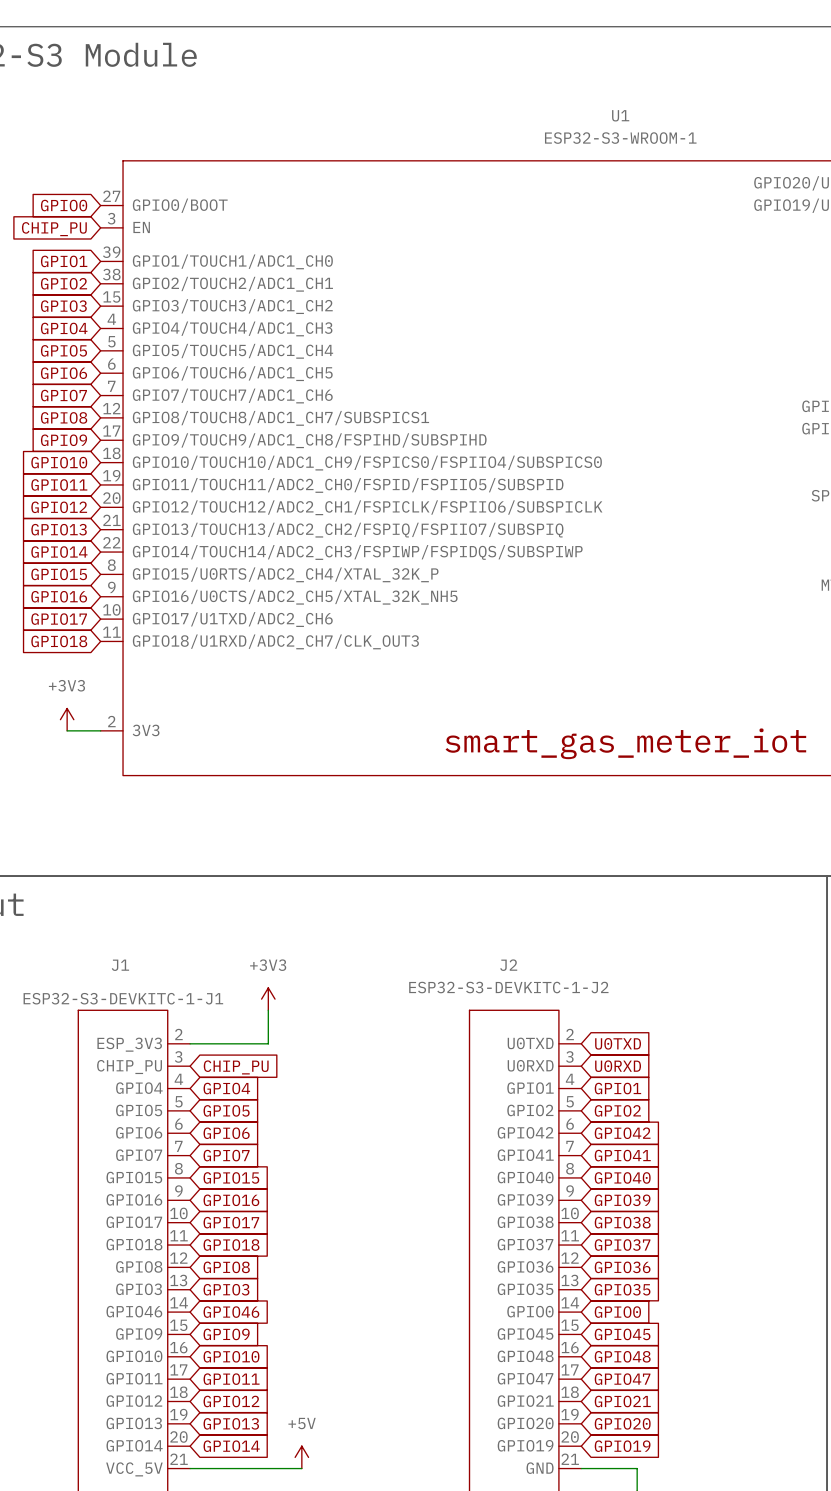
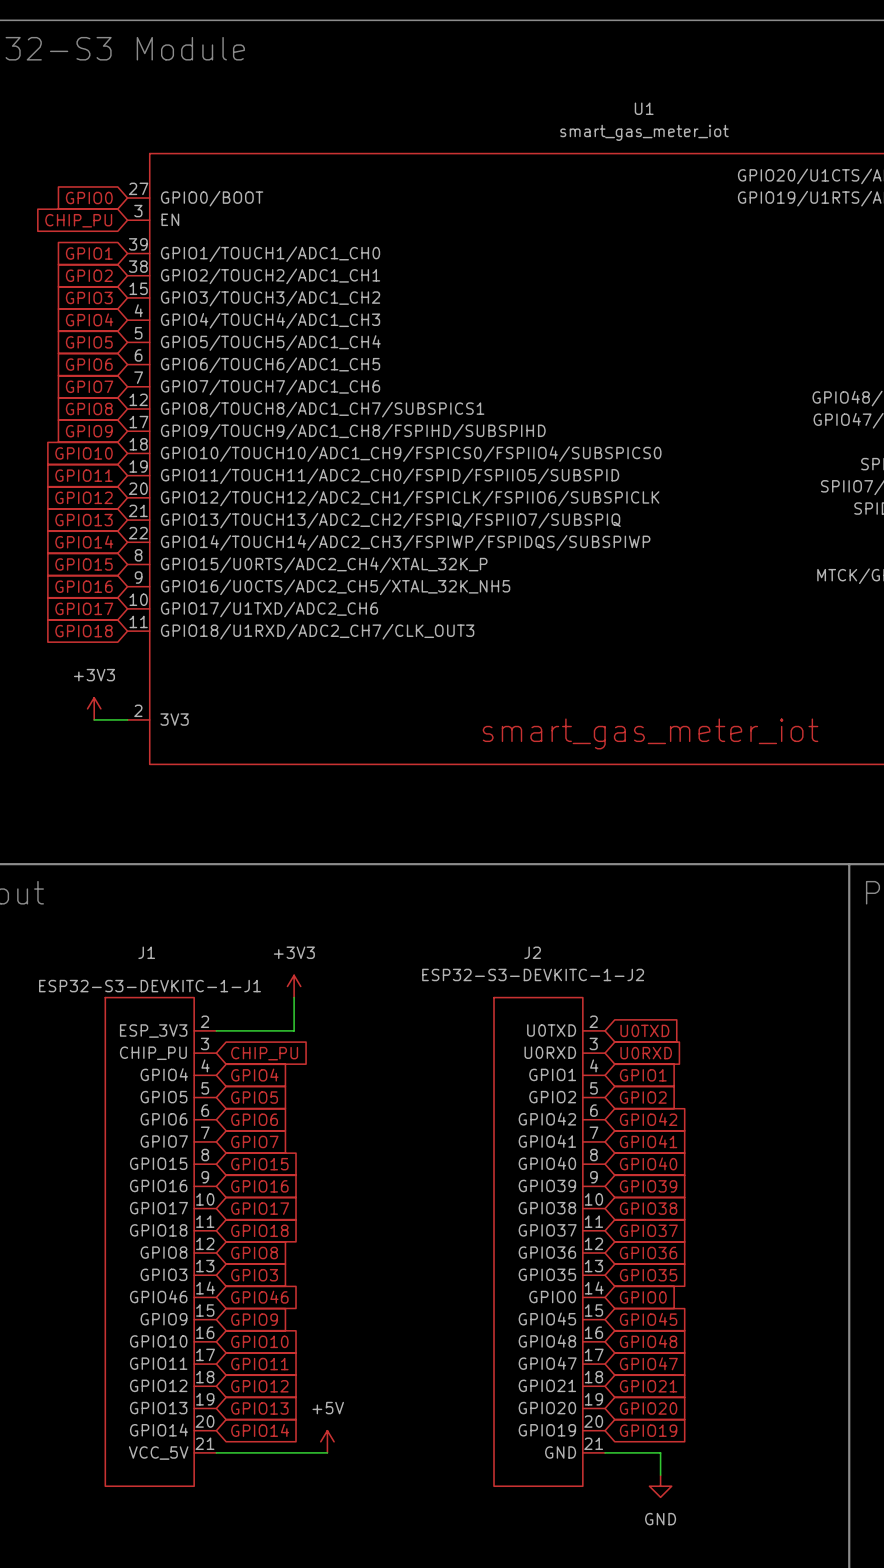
U1 value: ESP32-S3-WROOM-1 (620, 138) -> smart_gas_meter_iot (644, 132)

